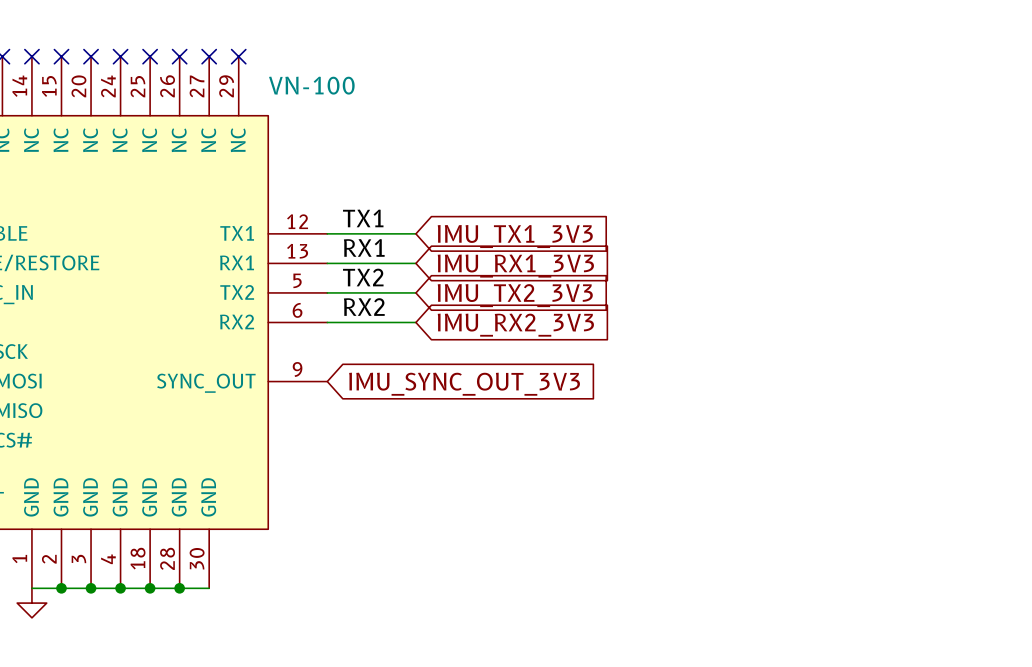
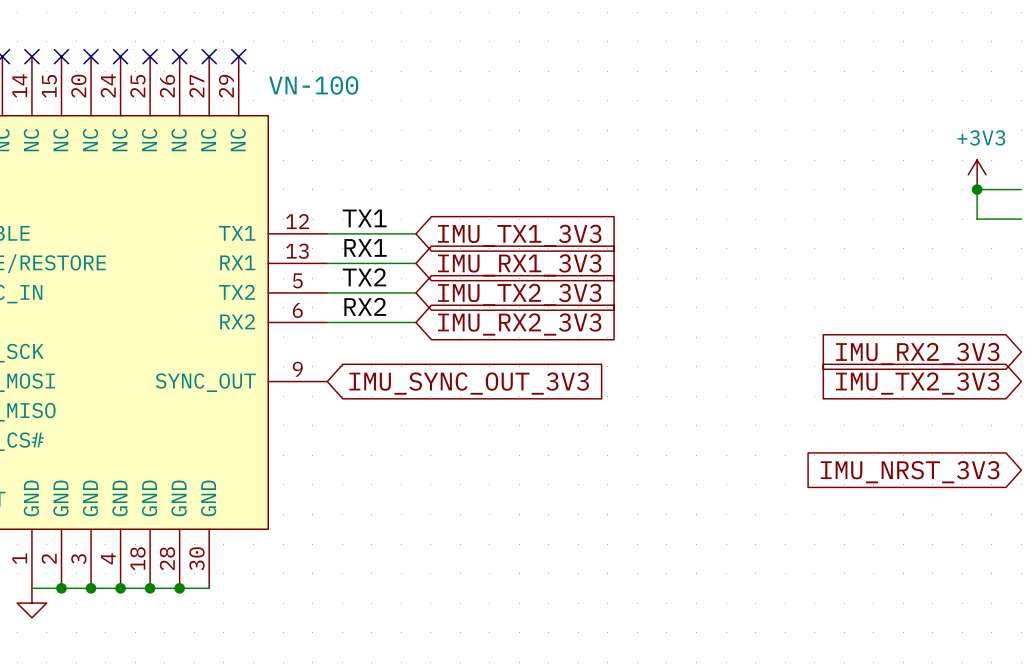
power symbol: none -> +3V3 (977, 174)
junction: none -> (977, 189)
wire: none -> (1021, 189) (977, 189) (977, 219) (1021, 219)
global label: none -> IMU_RX2_3V3 (917, 354)
global label: none -> IMU_TX2_3V3 (917, 383)
global label: none -> IMU_NRST_3V3 (910, 472)

